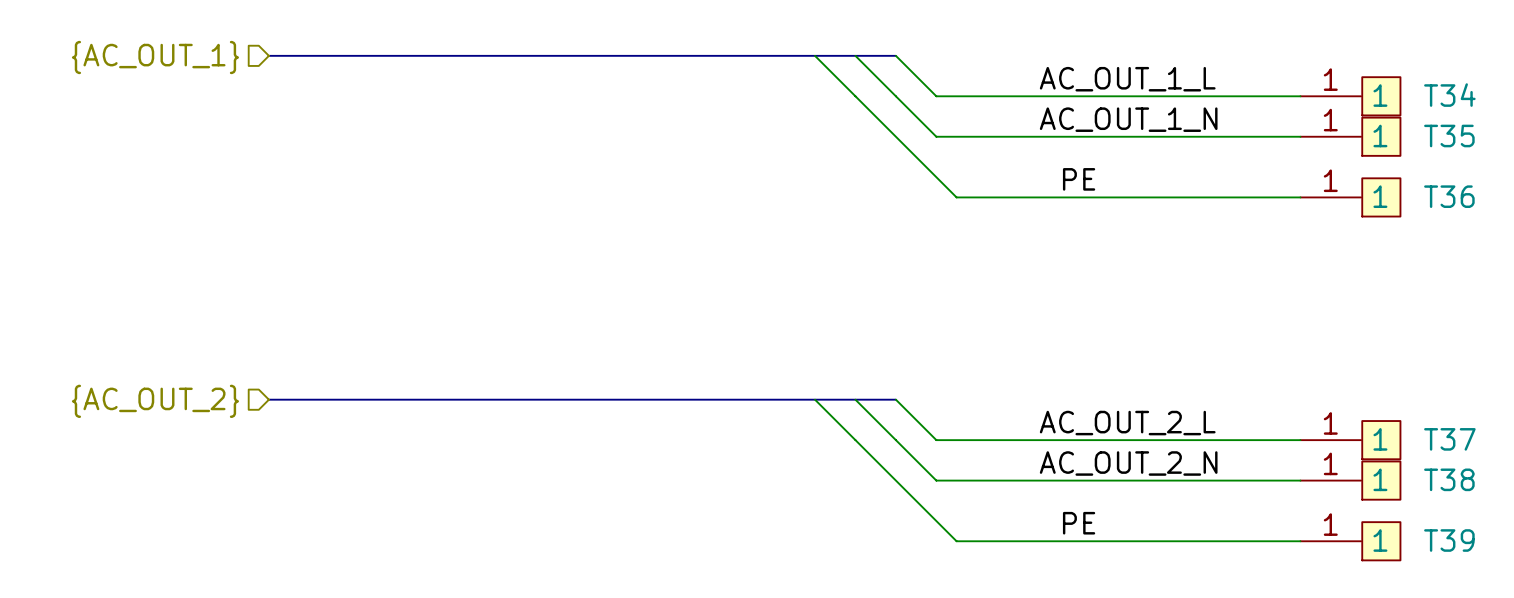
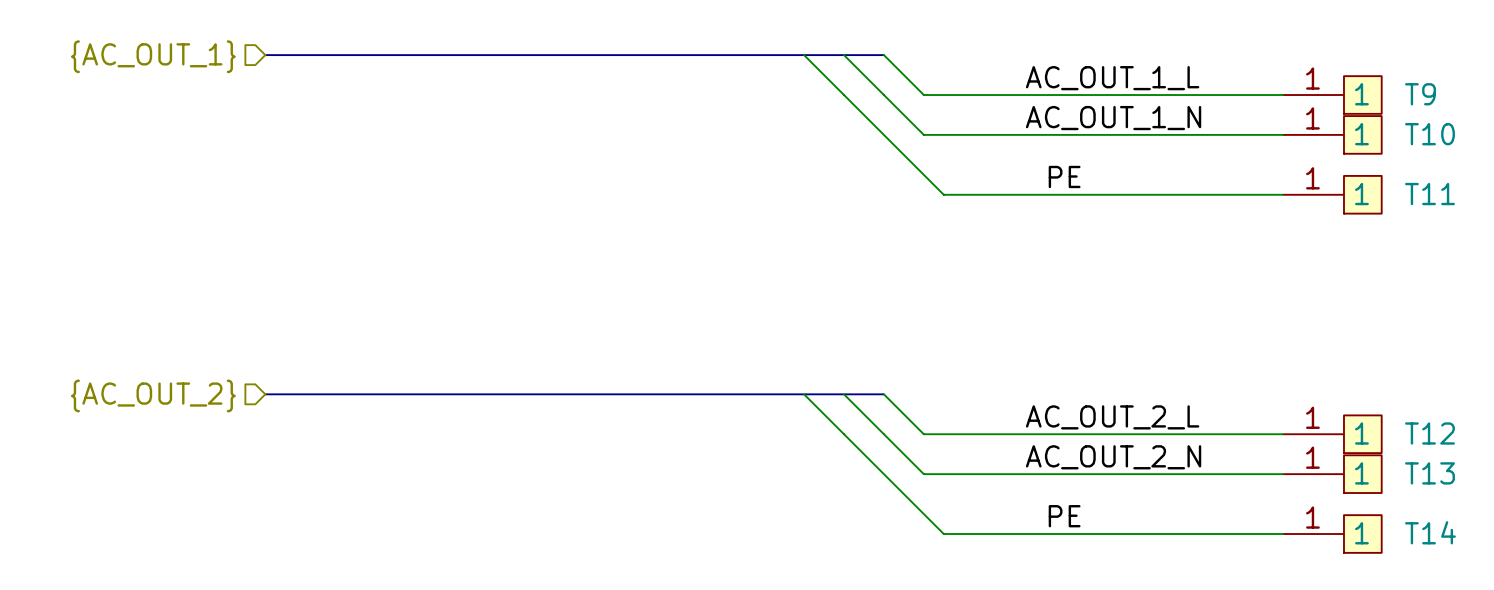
T34 name: T34 (1449, 95) -> T9 (1420, 94)
T35 name: T35 (1449, 135) -> T10 (1429, 134)
T36 name: T36 (1449, 196) -> T11 (1429, 194)
T37 name: T37 (1449, 439) -> T12 (1429, 433)
T38 name: T38 (1449, 479) -> T13 (1429, 473)
T39 name: T39 (1449, 540) -> T14 (1430, 532)

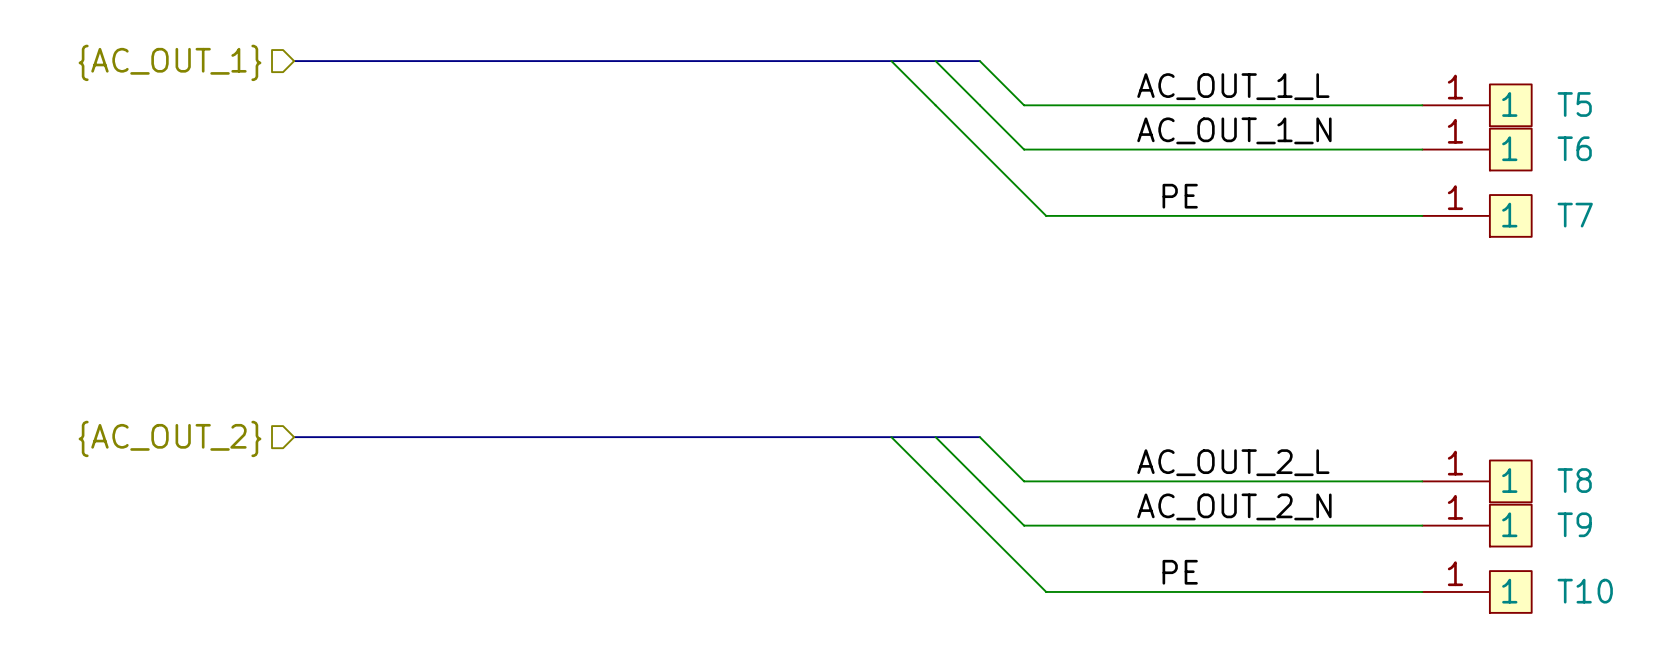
T9 name: T9 (1420, 94) -> T5 (1574, 104)
T10 name: T10 (1429, 134) -> T6 (1574, 148)
T11 name: T11 (1429, 194) -> T7 (1575, 215)
T12 name: T12 (1429, 433) -> T8 (1574, 480)
T13 name: T13 (1429, 473) -> T9 (1574, 524)
T14 name: T14 (1430, 532) -> T10 (1585, 591)

